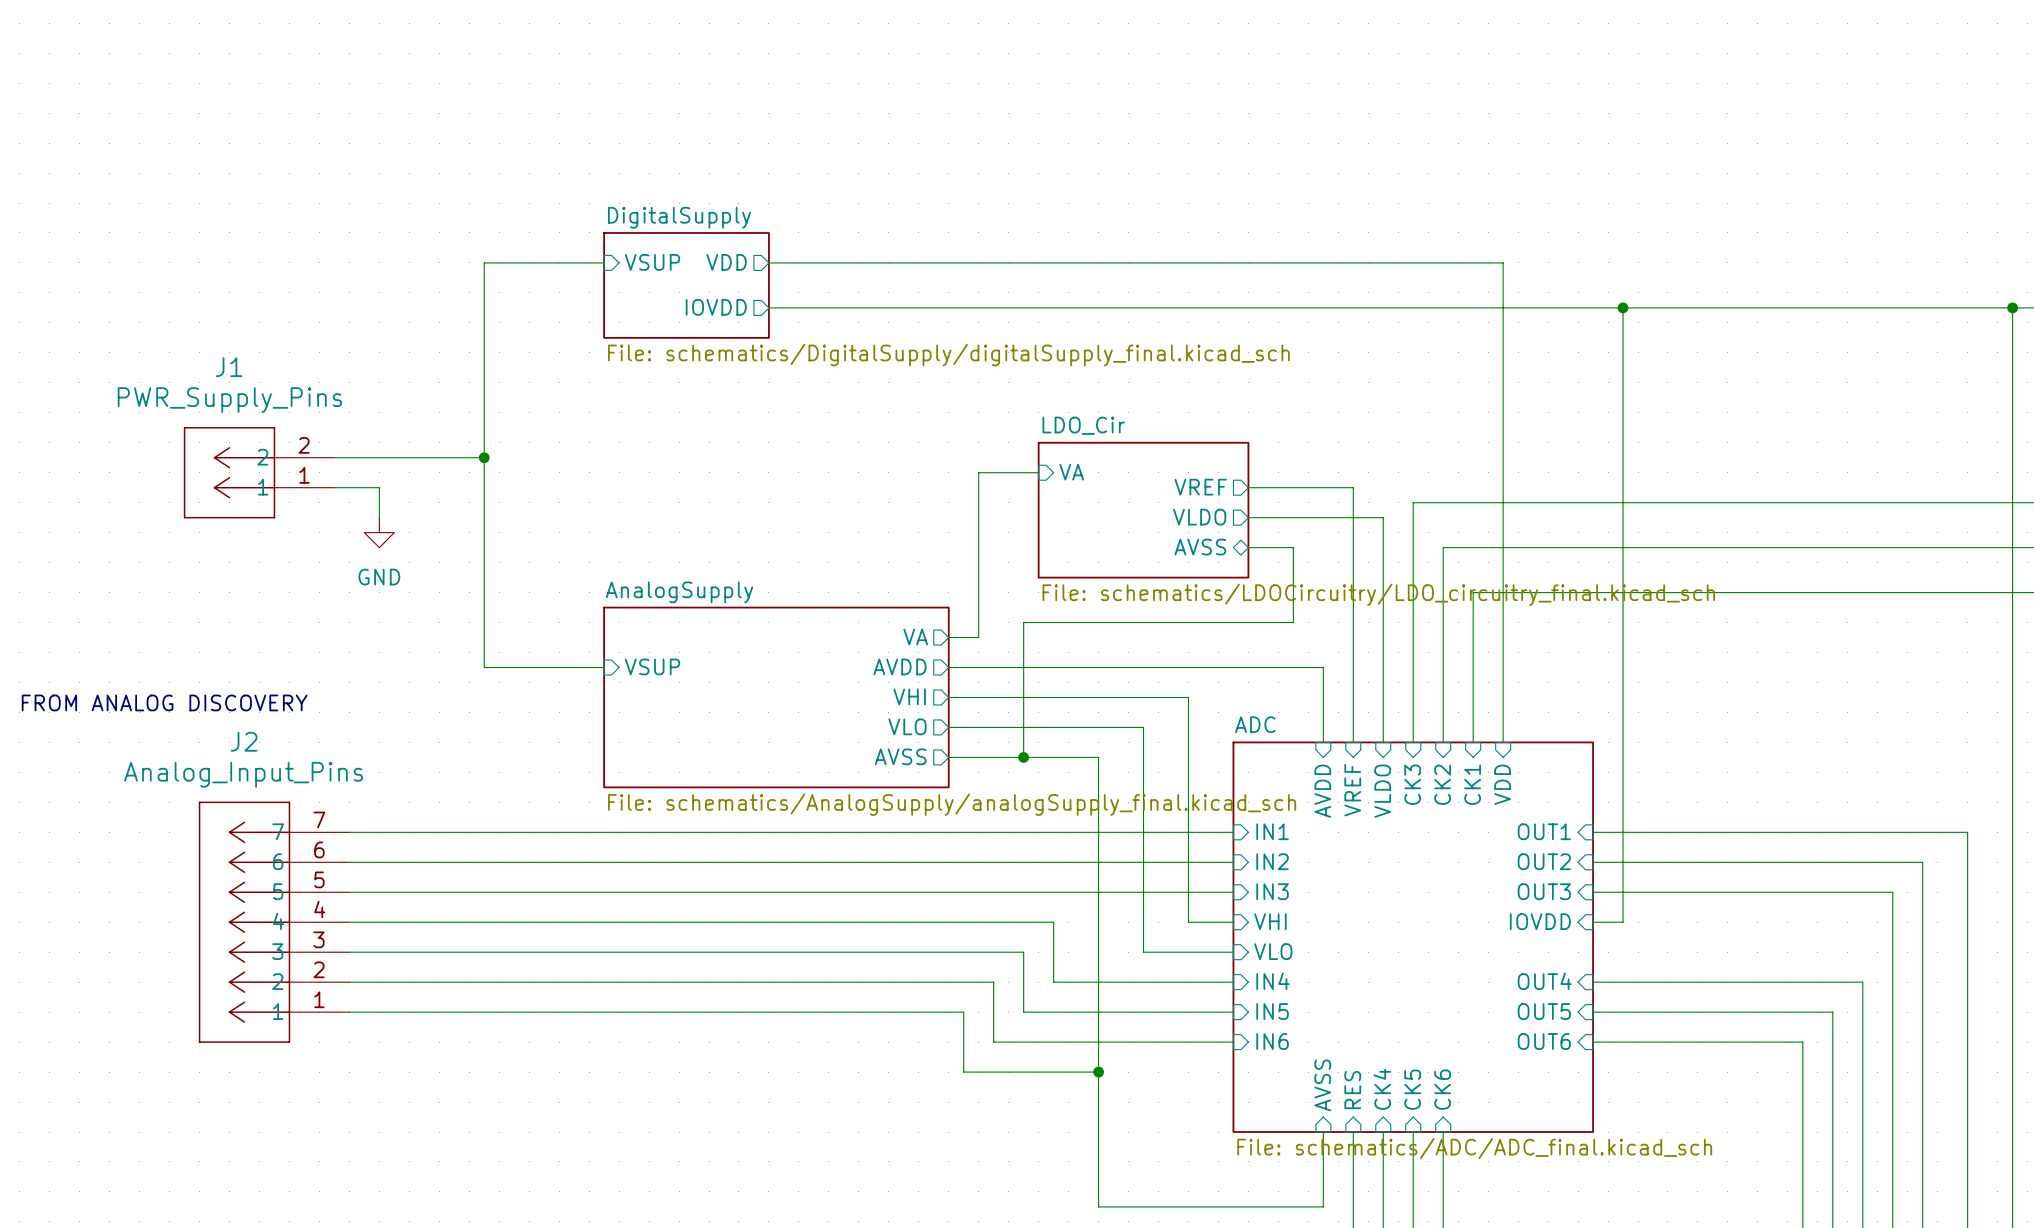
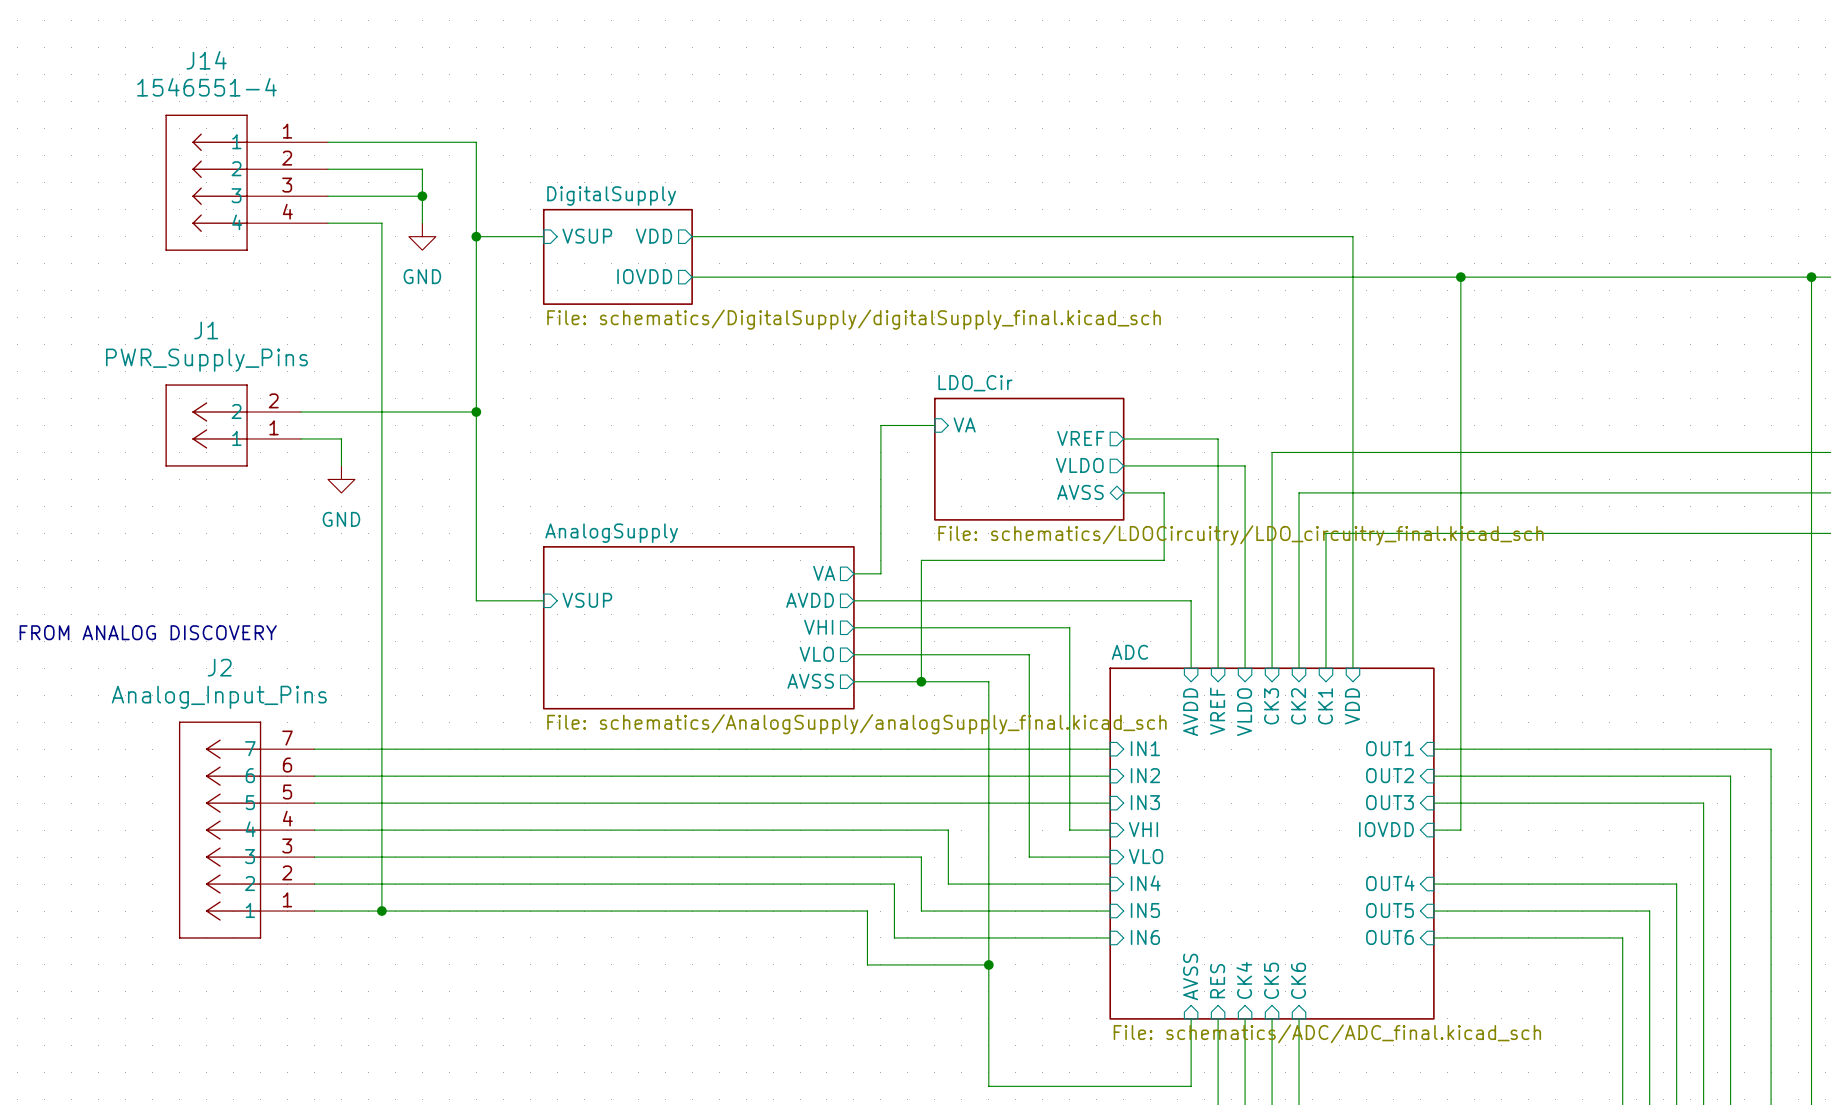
wire: none -> (327, 169) (422, 169) (422, 223)
J14: none -> 1546551-4 (246, 182)
wire: none -> (327, 196) (422, 196)
junction: none -> (422, 196)
wire: none -> (327, 223) (381, 223) (381, 911)
power symbol: none -> GND (422, 236)
wire: (529, 262) (484, 262) (484, 667) (529, 667) -> (327, 142) (476, 142) (476, 600)
junction: none -> (476, 236)
wire: none -> (435, 412) (476, 412)
junction position: (484, 457) -> (476, 412)
junction: none -> (381, 911)

